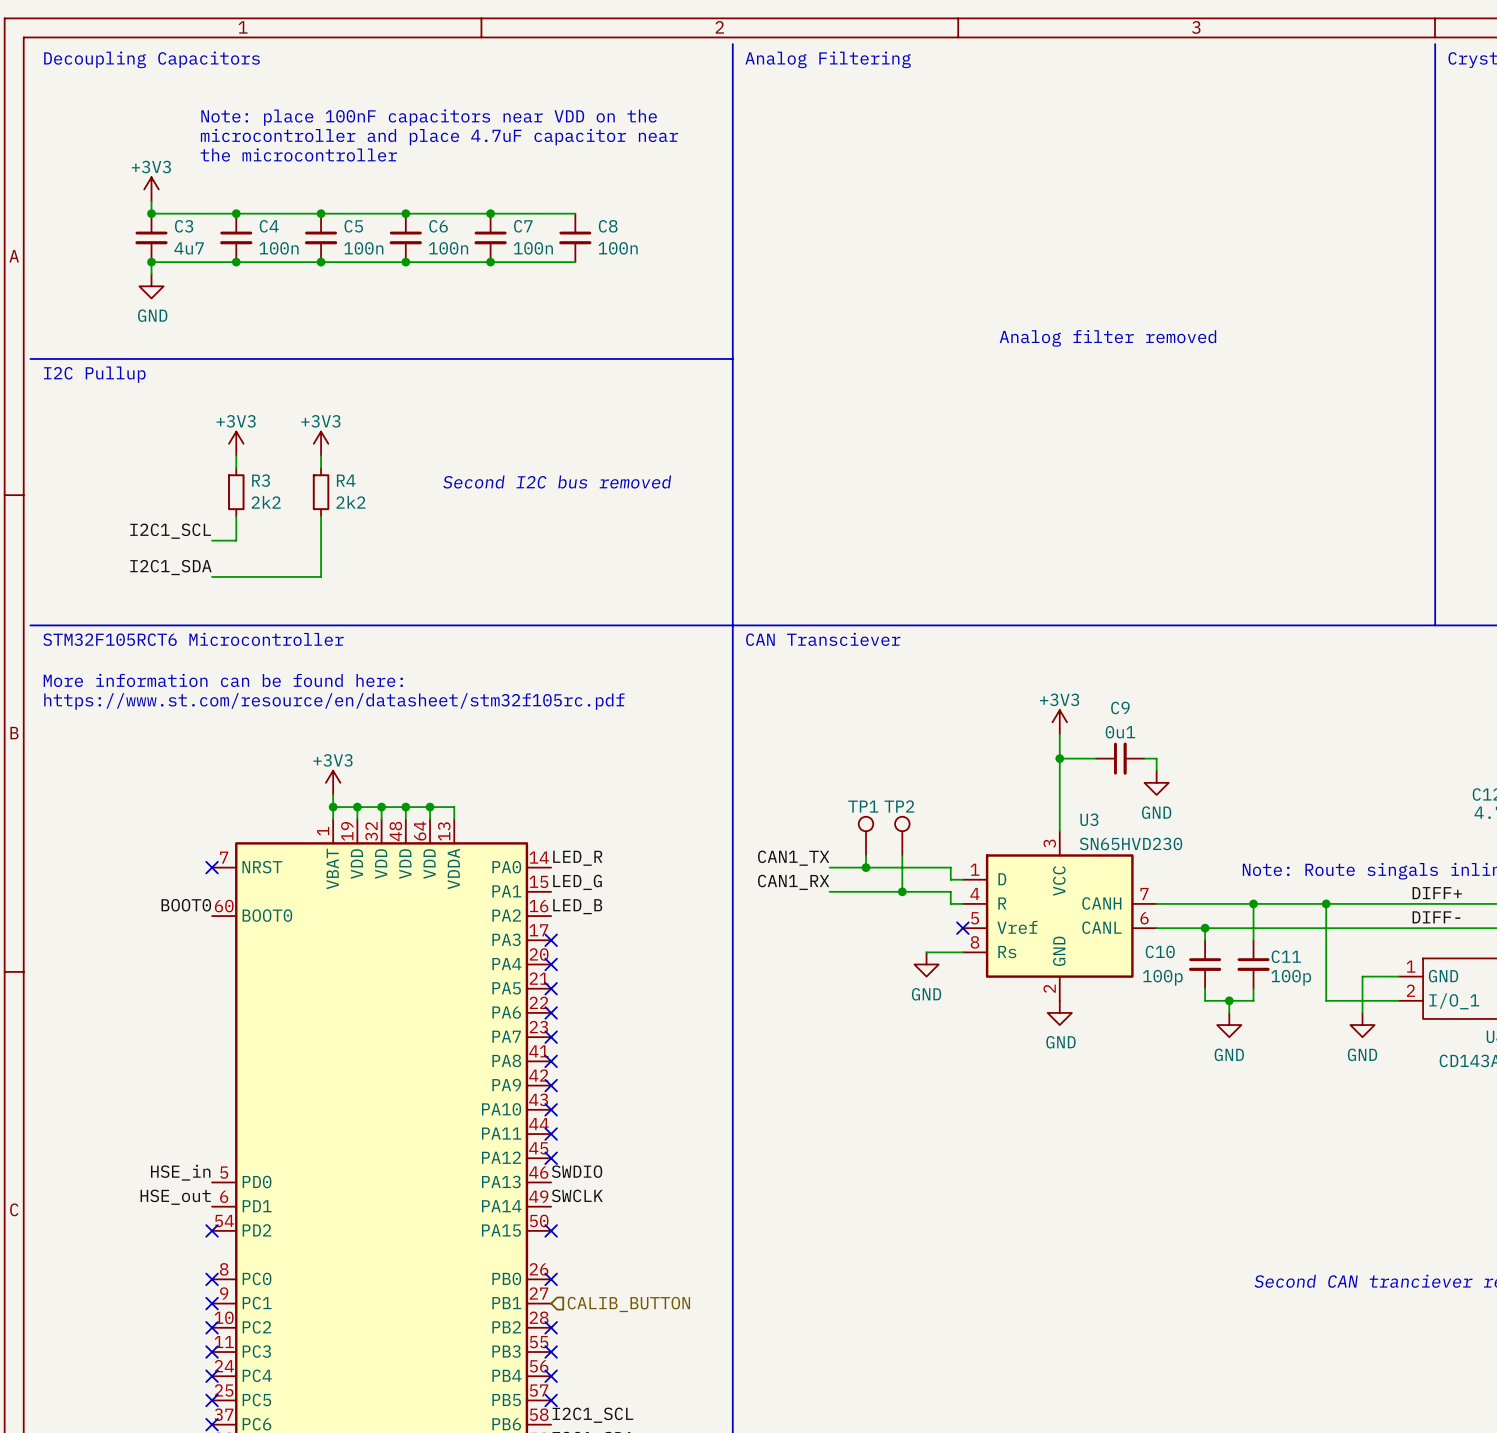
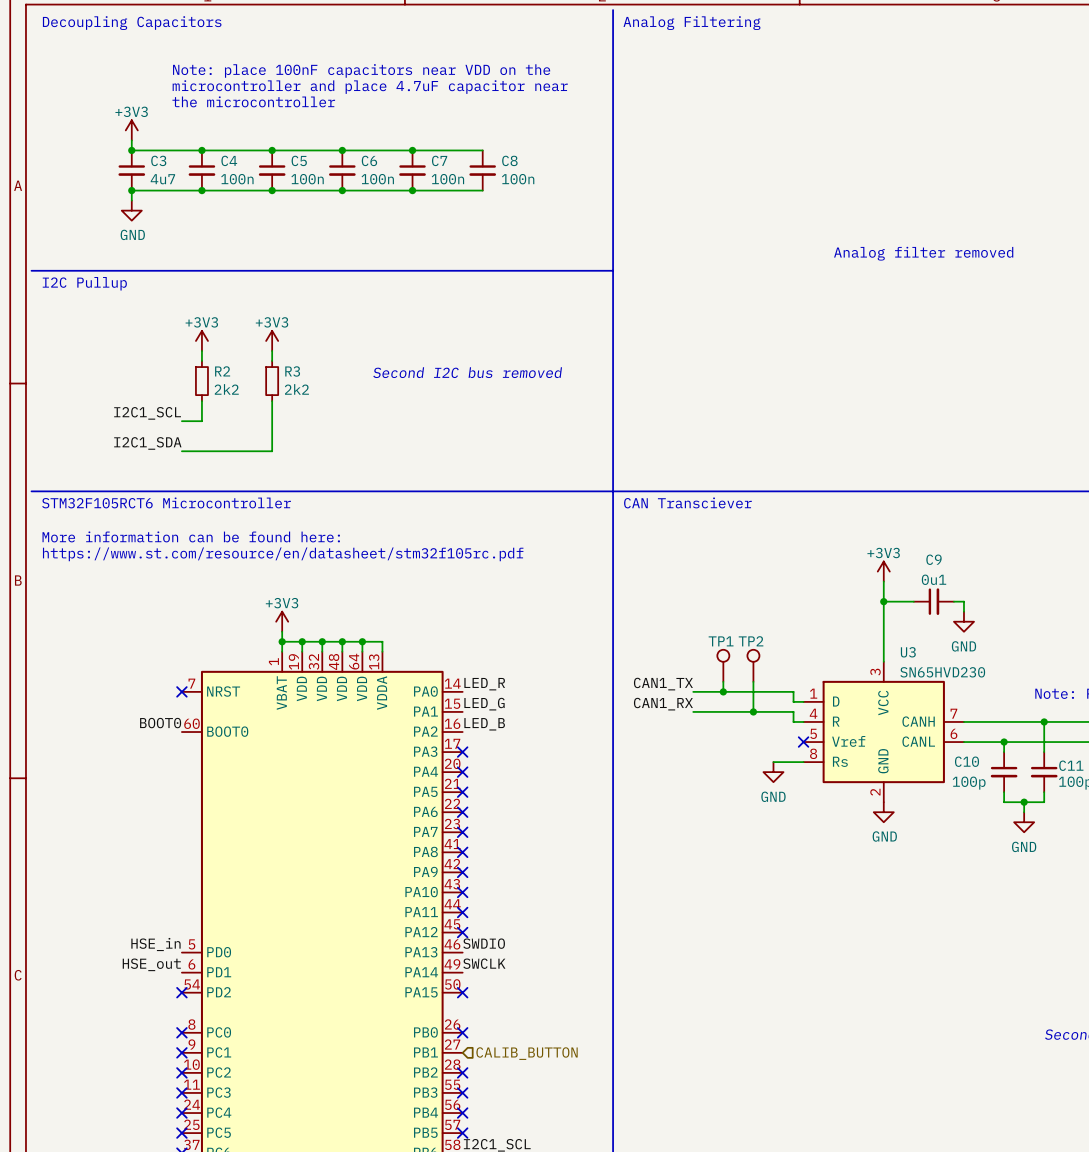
R3 name: R3 (261, 480) -> R2 (222, 371)
R4 name: R4 (346, 480) -> R3 (292, 371)

